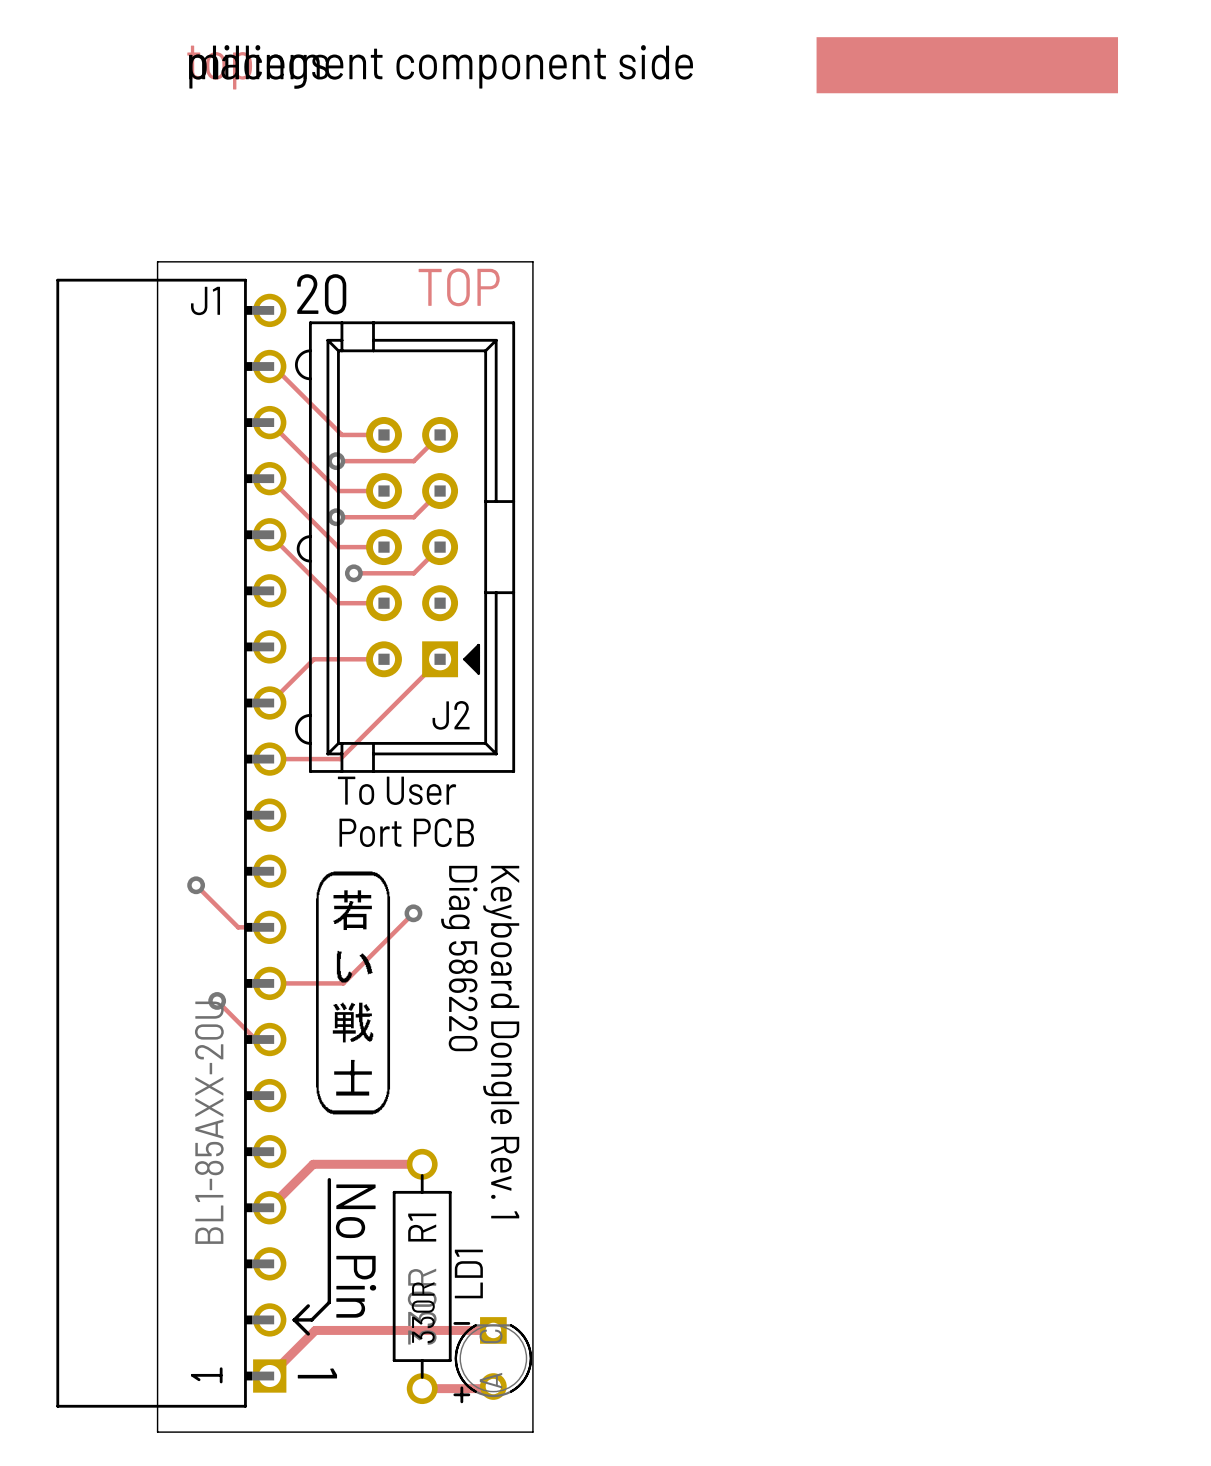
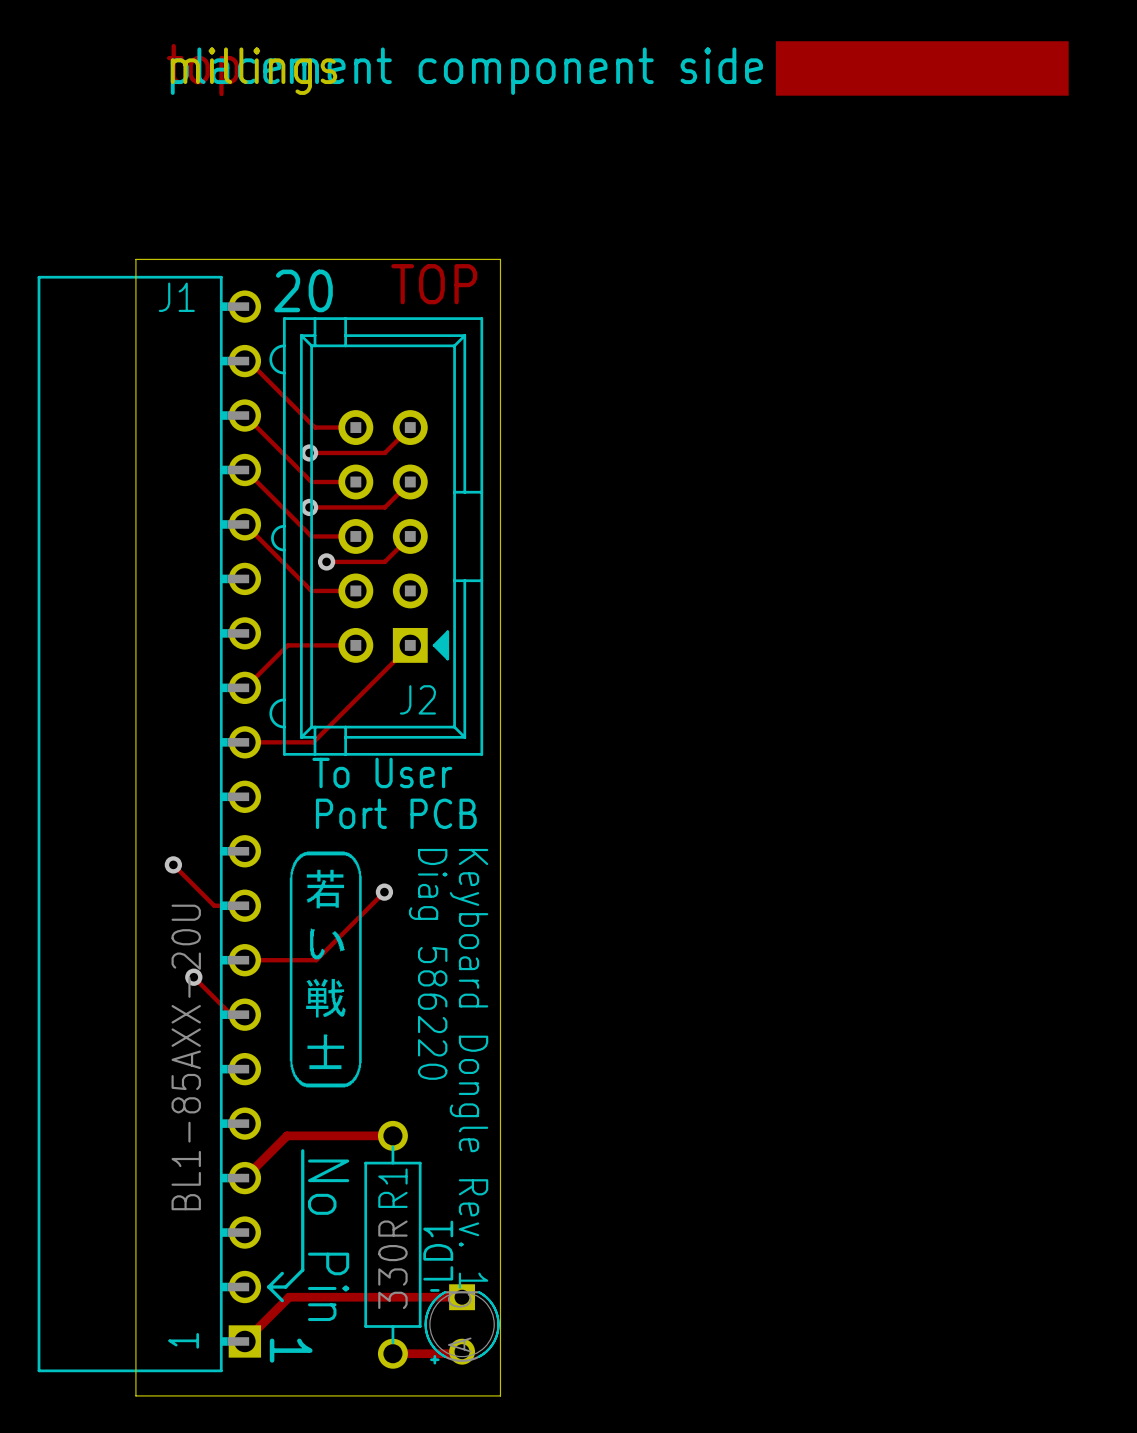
text: 330R (423, 1312) -> none
LD1 footprint: [453, 1317, 533, 1404] -> [424, 1284, 500, 1365]

